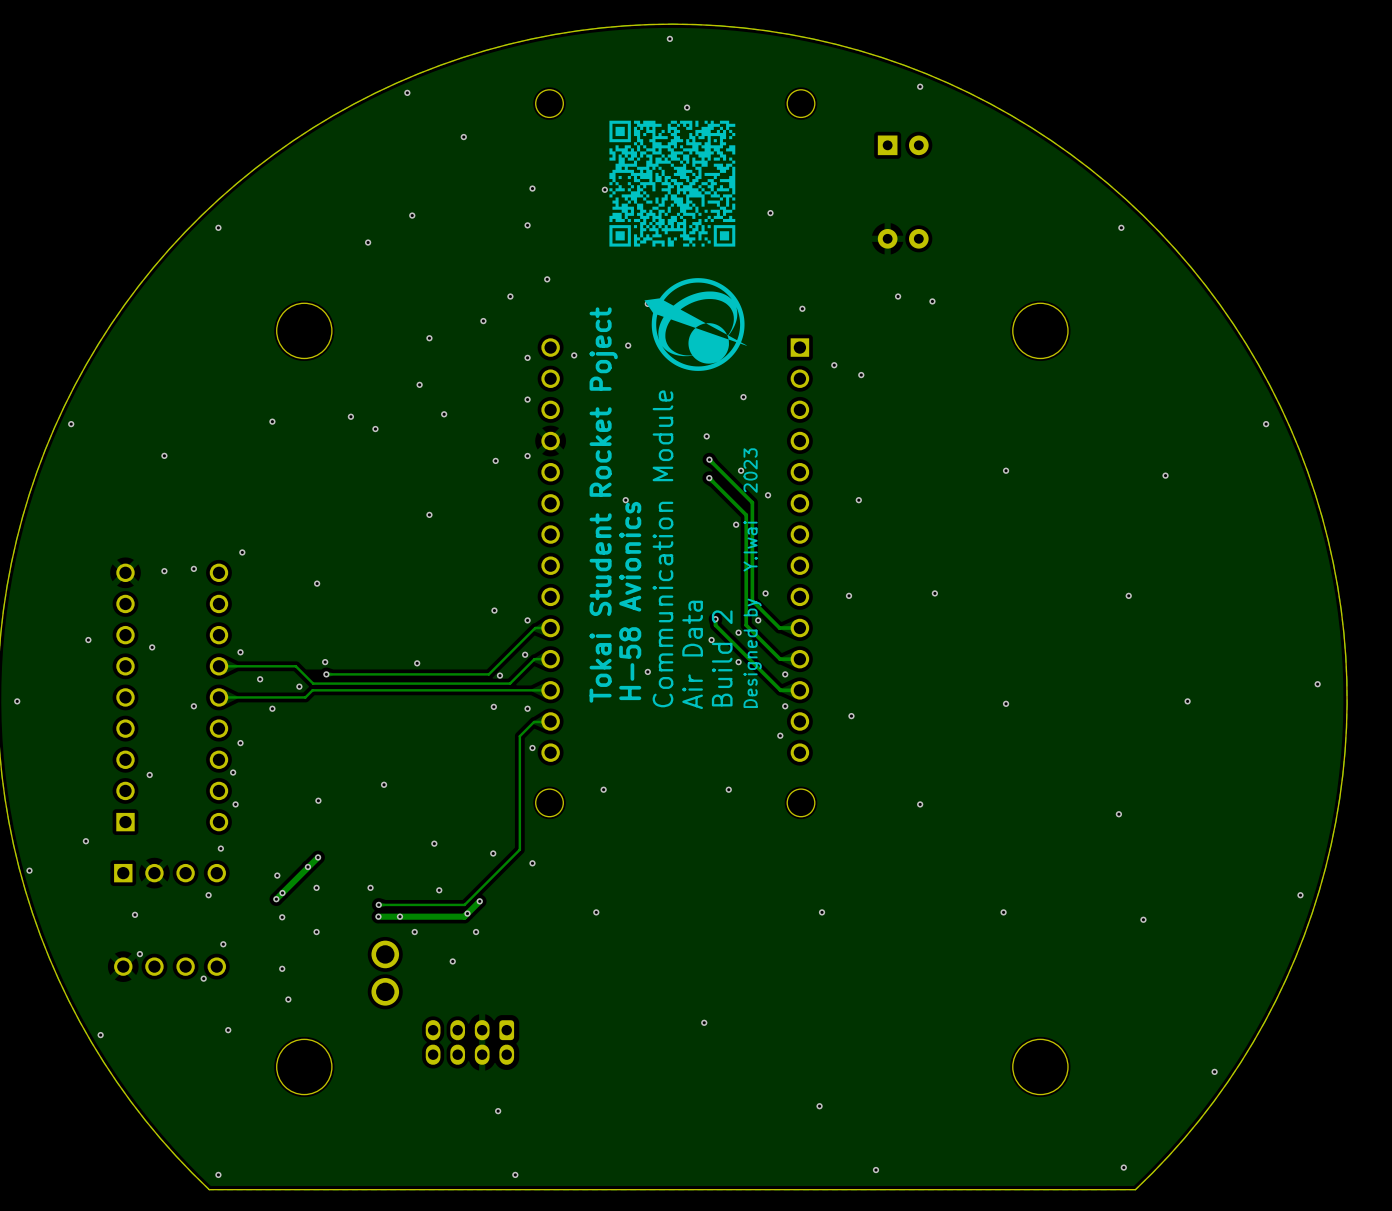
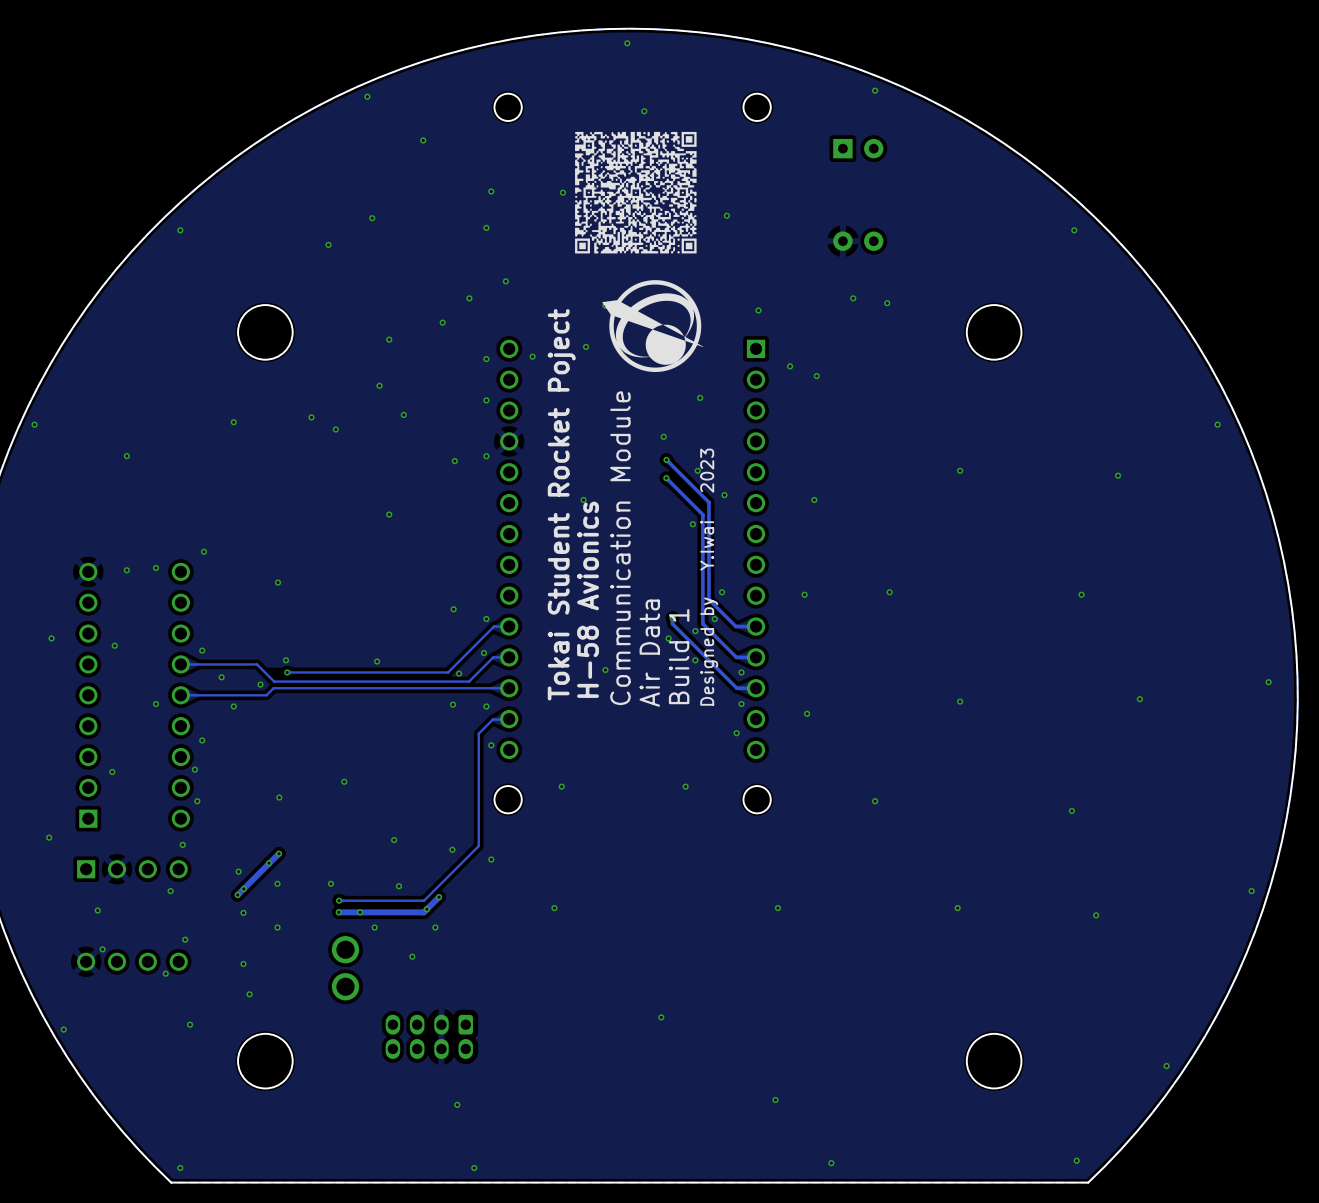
drawing shape: [609, 120, 736, 247] -> [575, 131, 697, 254]
text: Build 2 (722, 658) -> Build 1 (679, 656)

